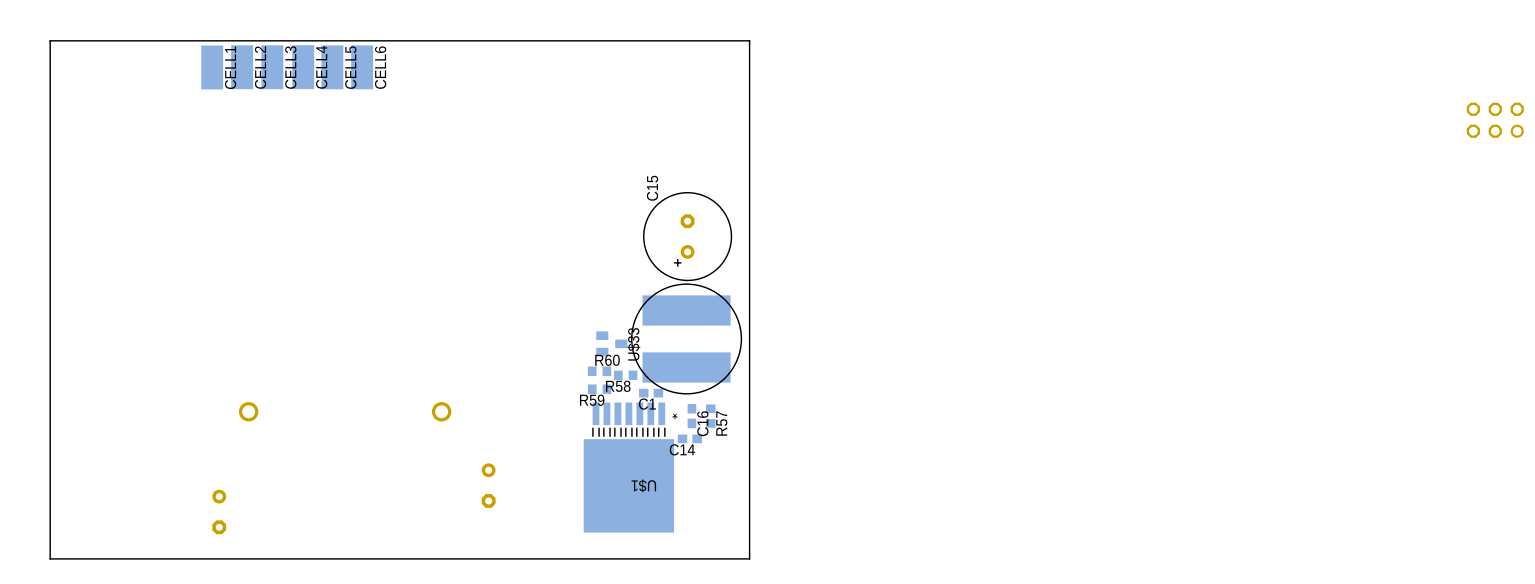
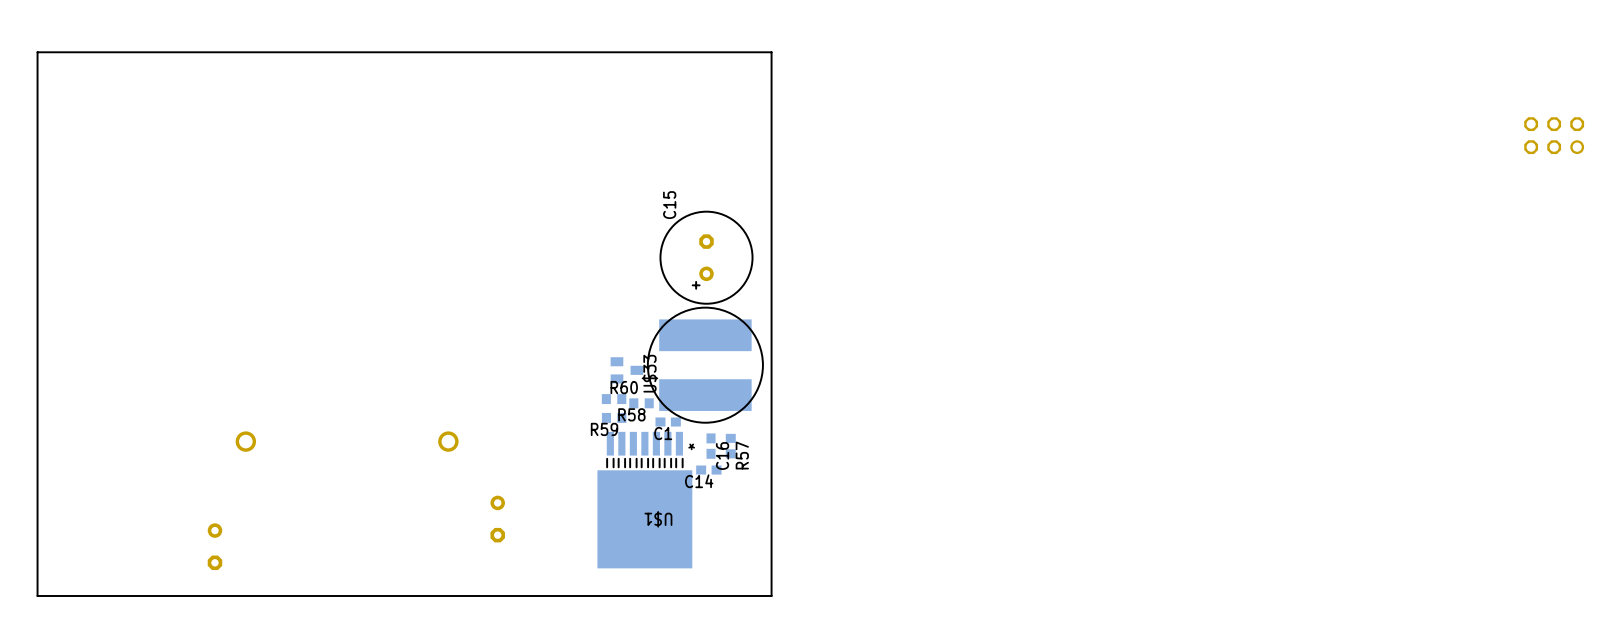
CELL1: (212, 67) -> none
CELL2: (242, 67) -> none
CELL3: (272, 67) -> none
CELL4: (303, 67) -> none
CELL5: (332, 67) -> none
CELL6: (362, 67) -> none

